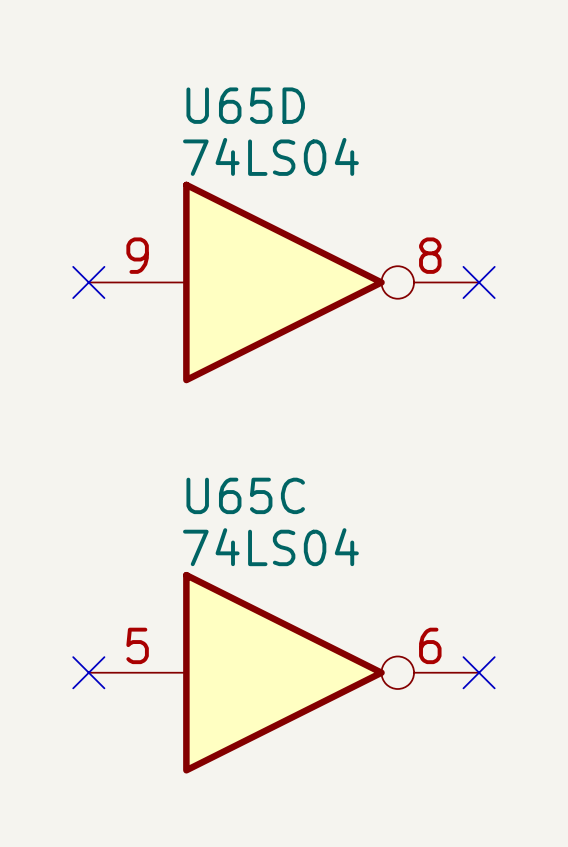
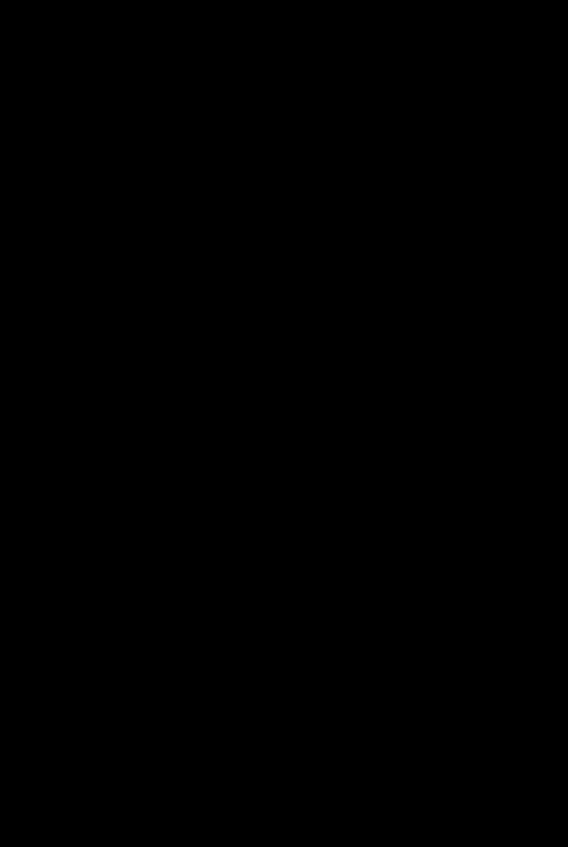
no-connect mark: (88, 282) -> none
U65D: 74LS04 (283, 282) -> none
no-connect mark: (479, 282) -> none
no-connect mark: (88, 672) -> none
U65C: 74LS04 (283, 672) -> none
no-connect mark: (479, 672) -> none

